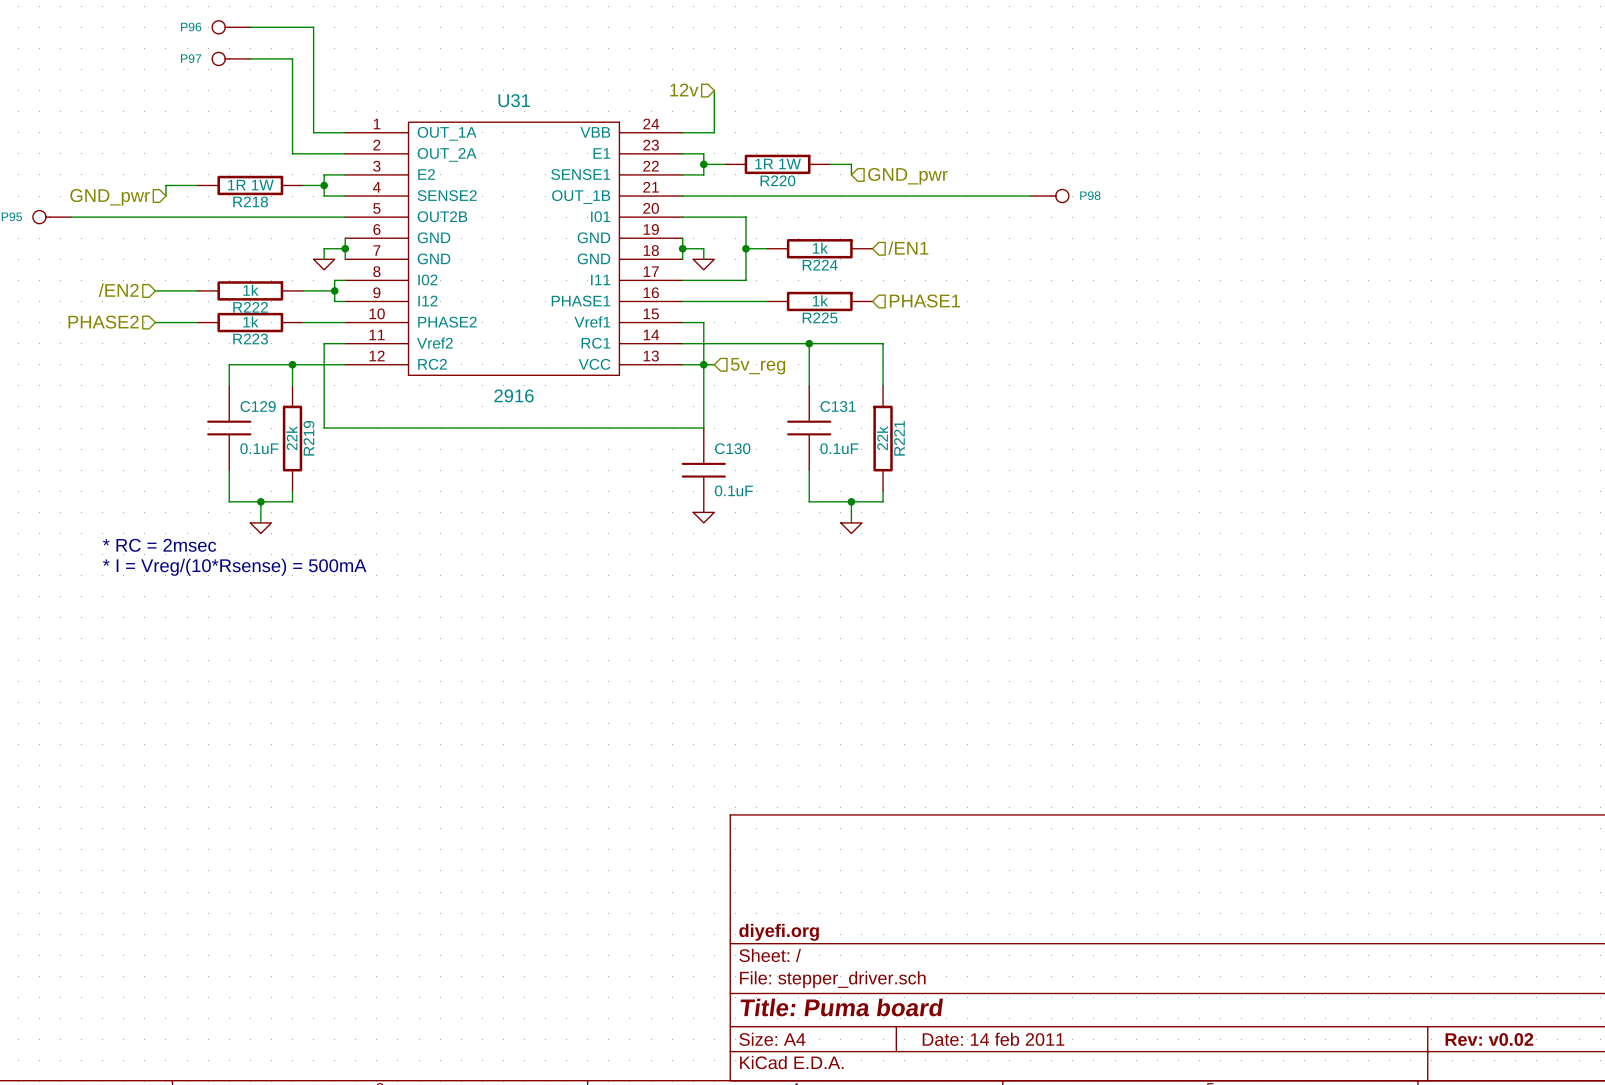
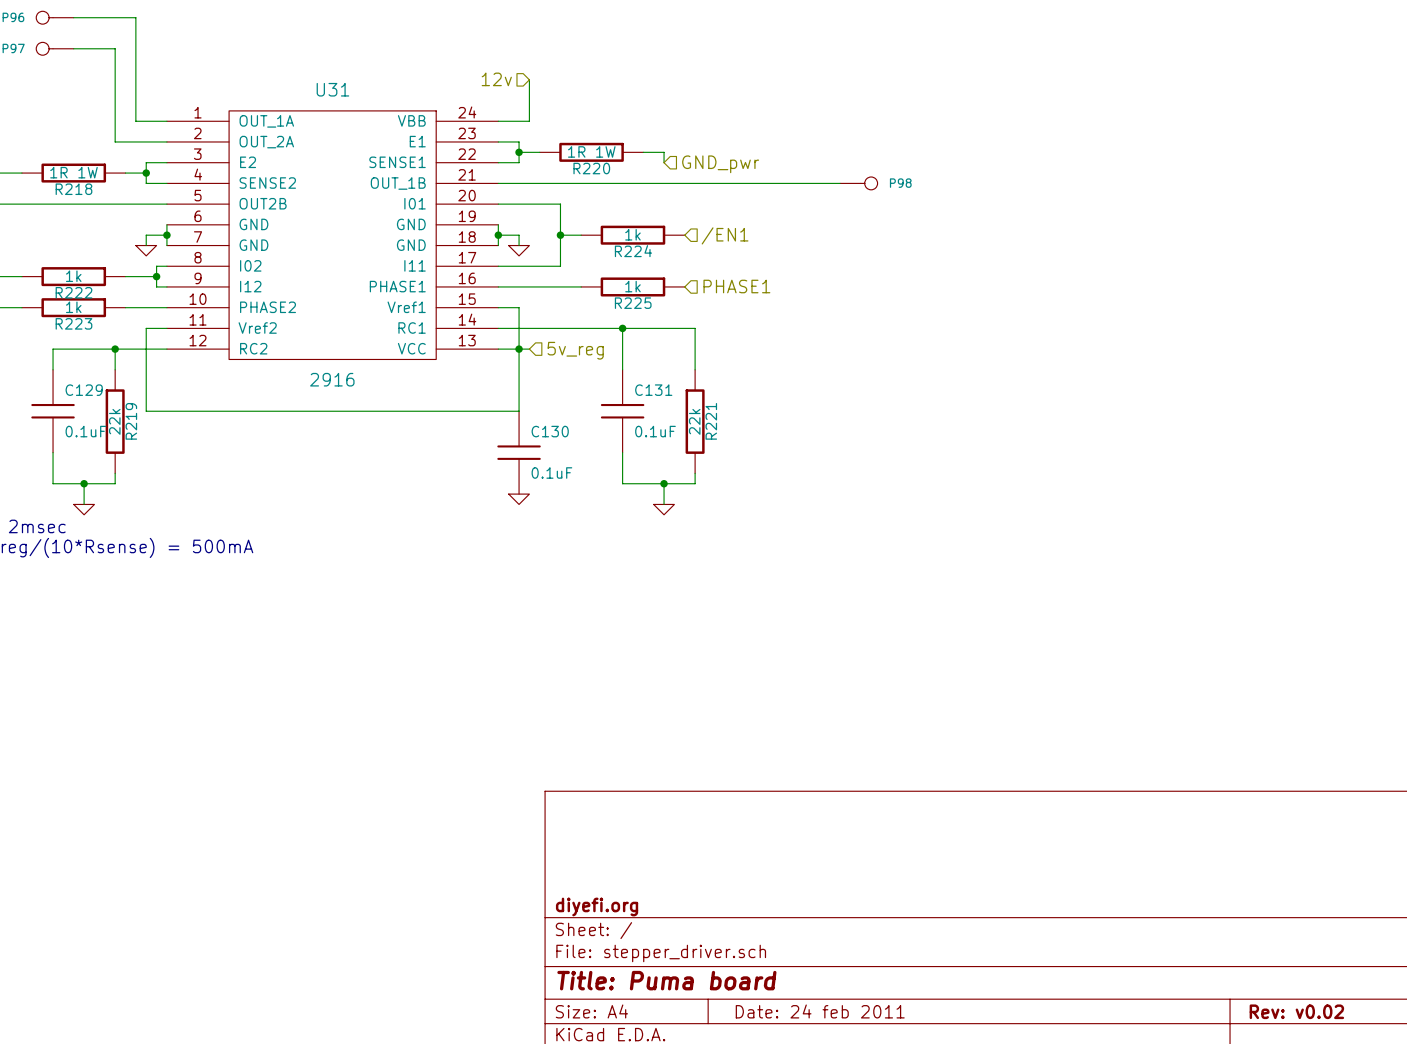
title block: Date: 14 feb 2011 (993, 1039) -> Date: 24 feb 2011 (820, 1011)

